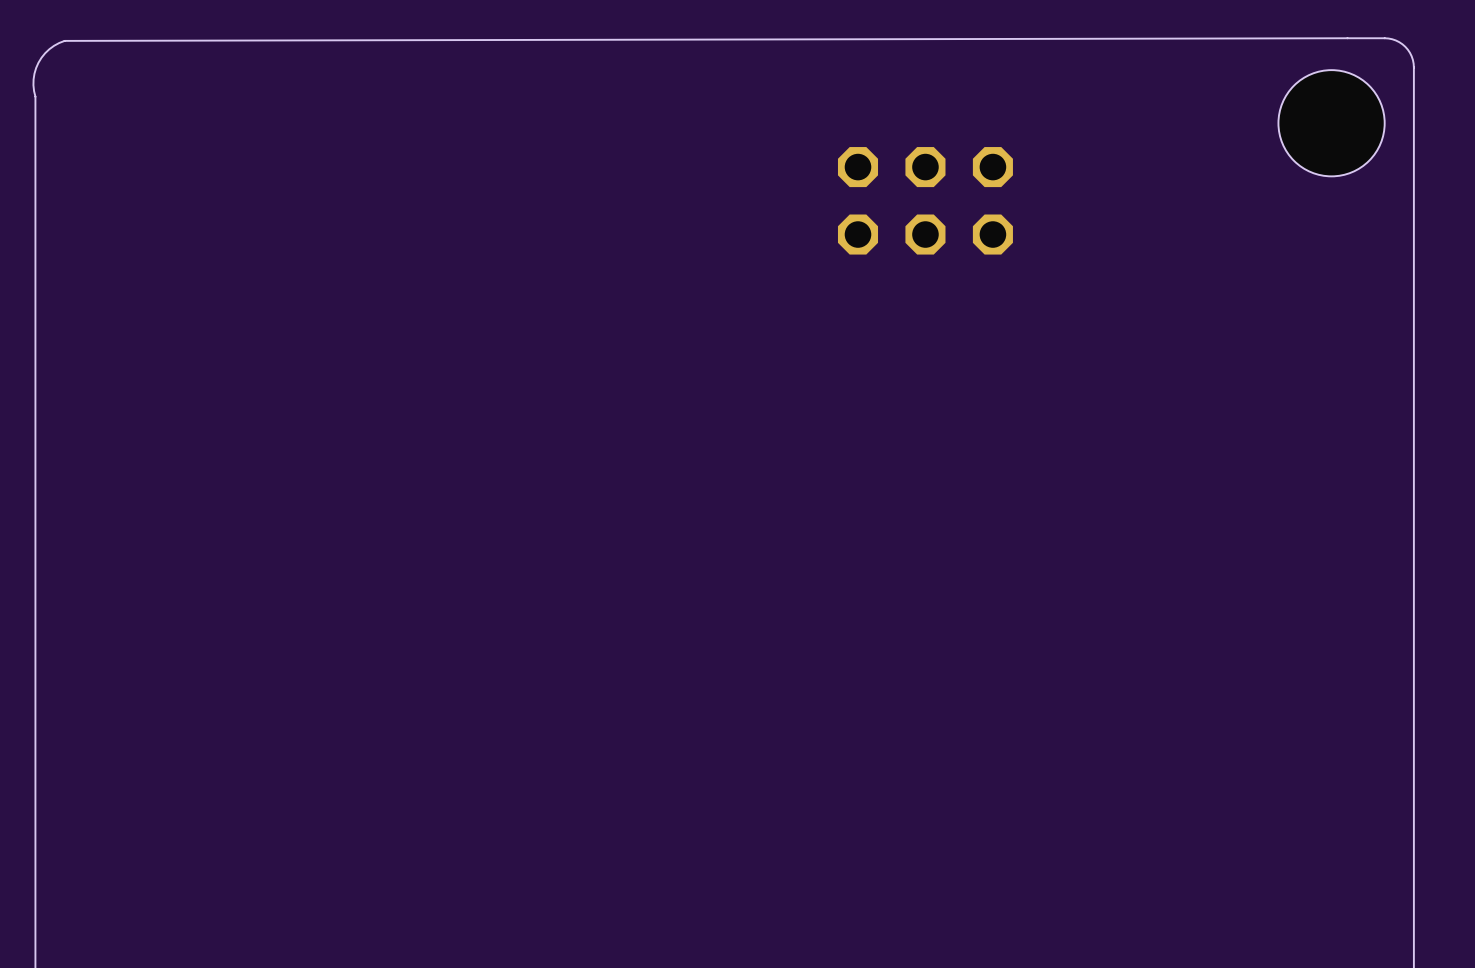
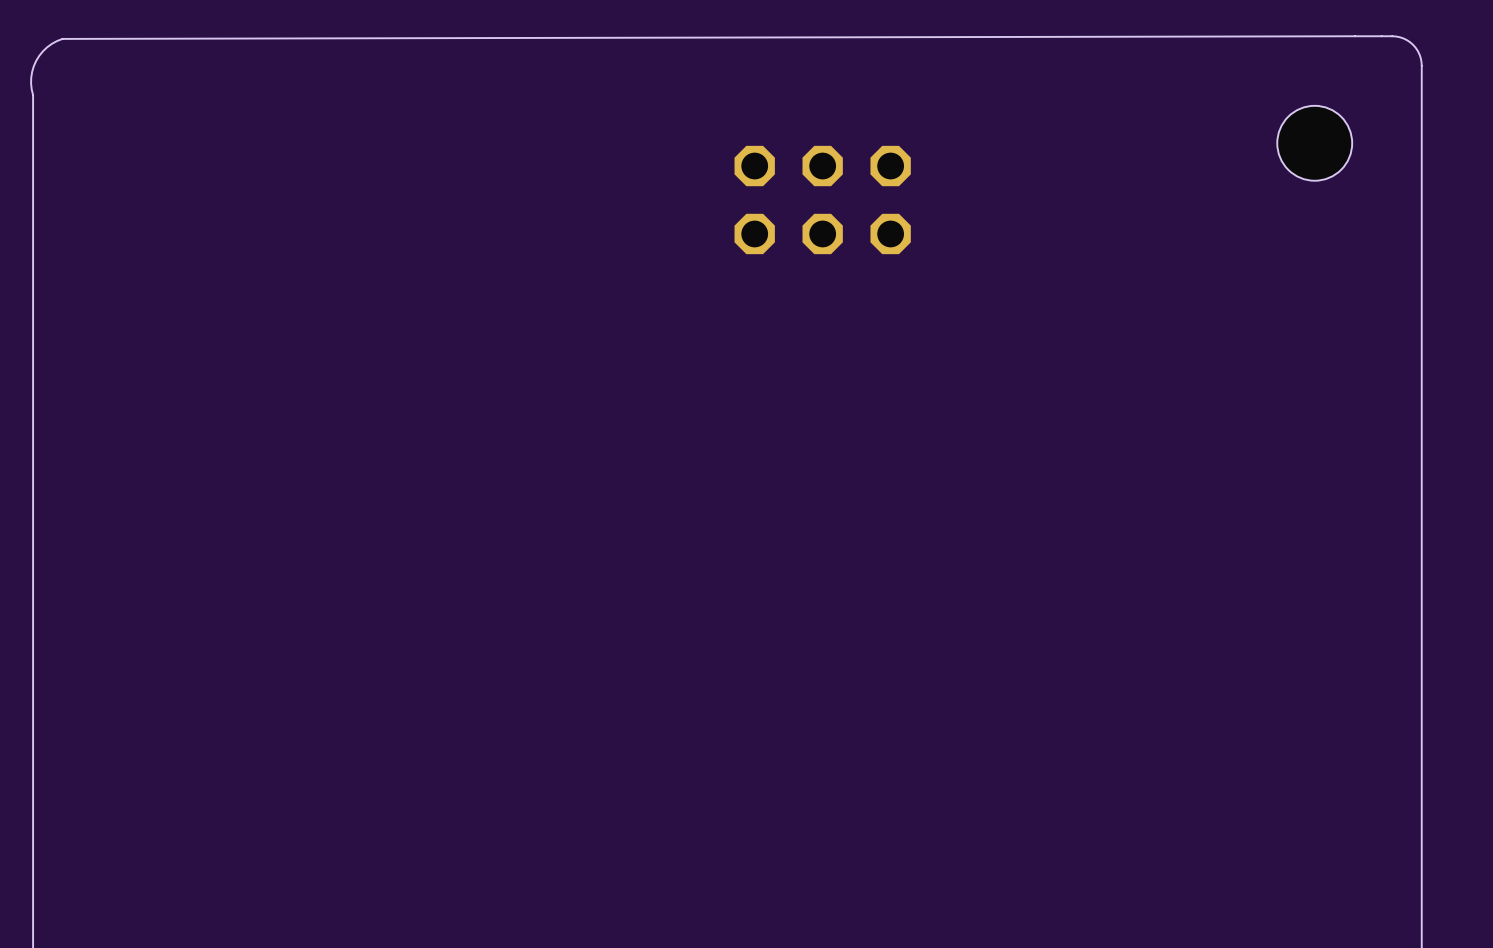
hole: (1331, 123) -> none
part: none -> (1314, 143)
part position: (925, 200) -> (822, 200)

